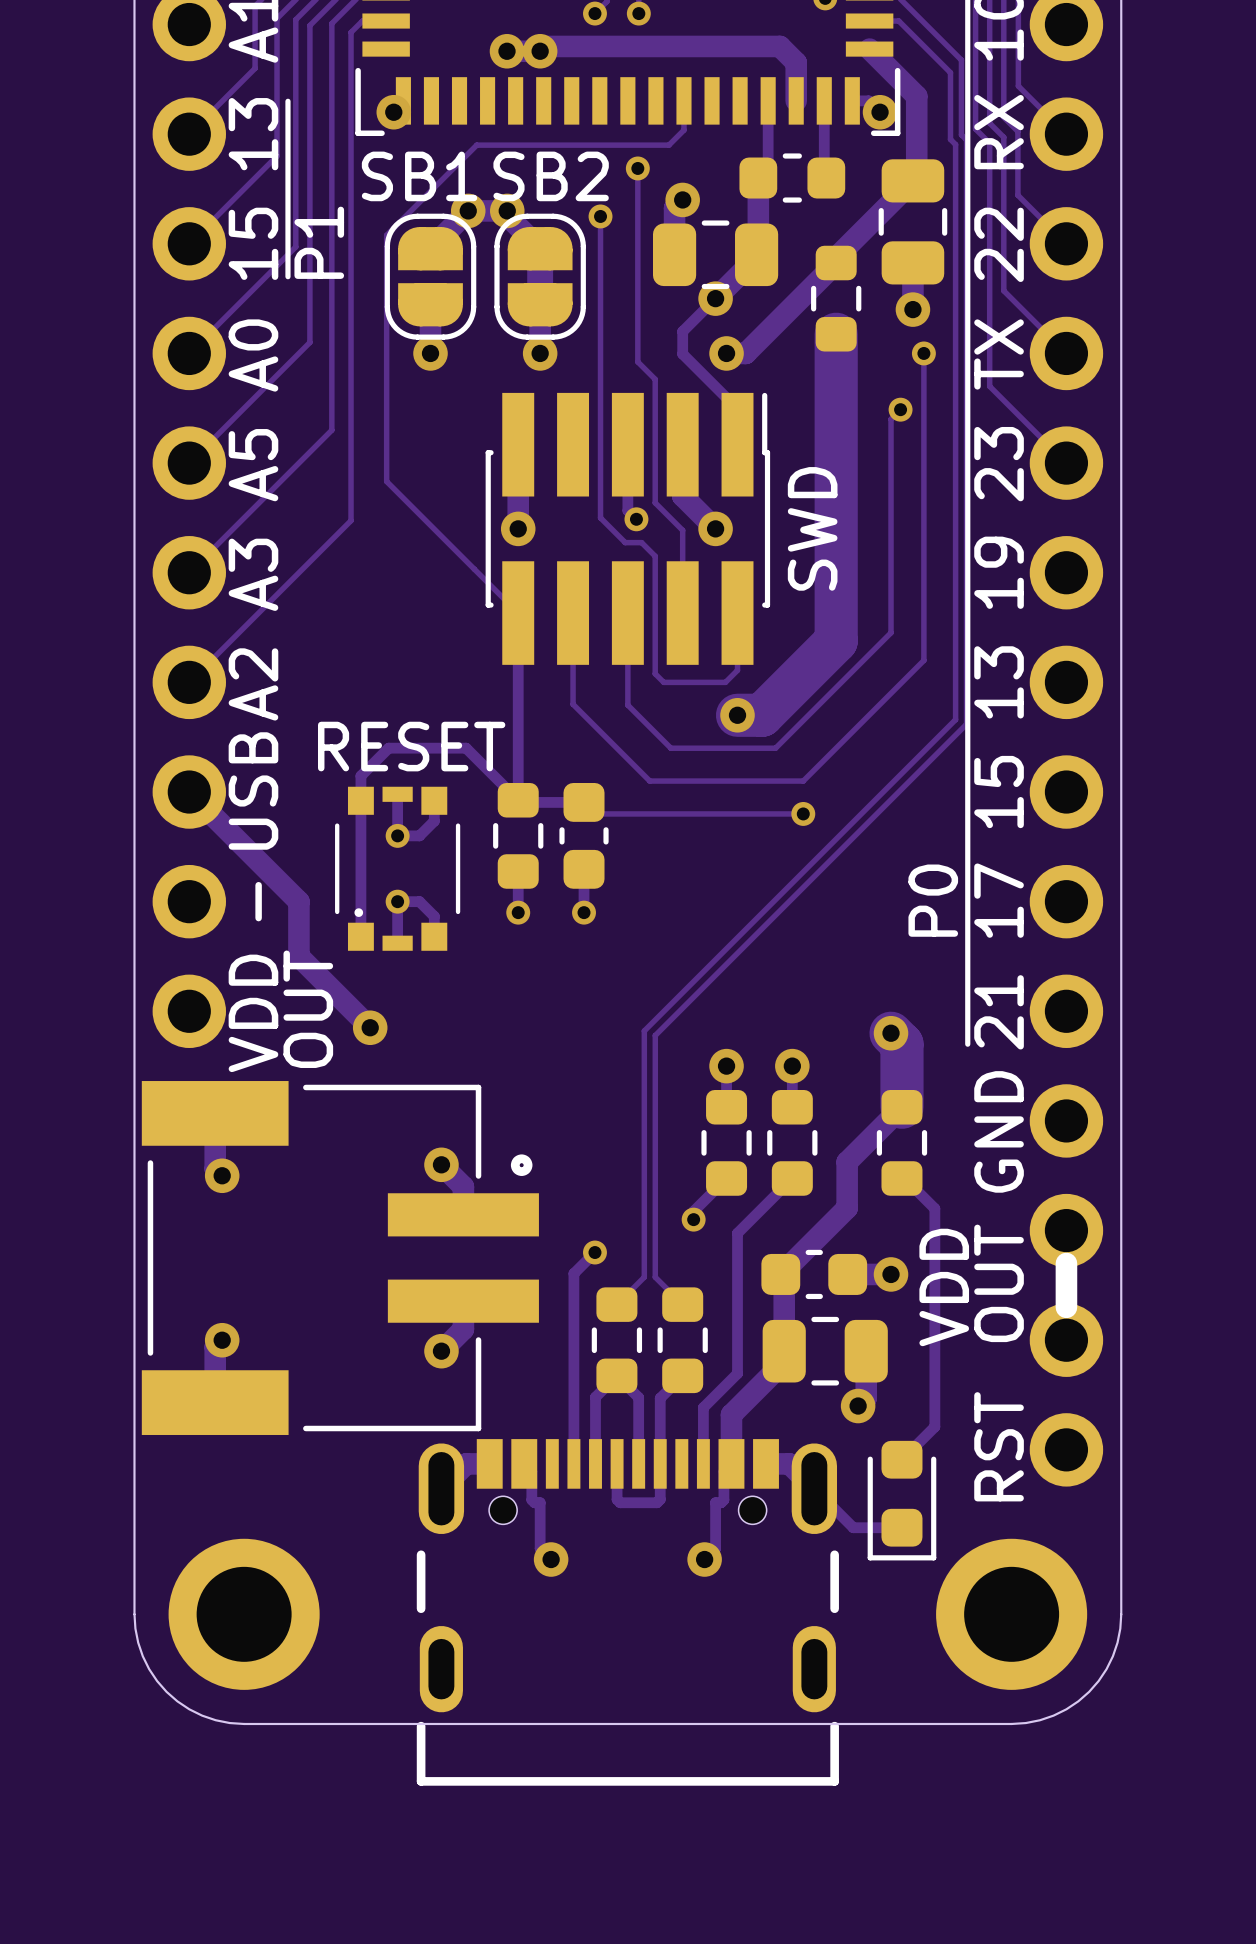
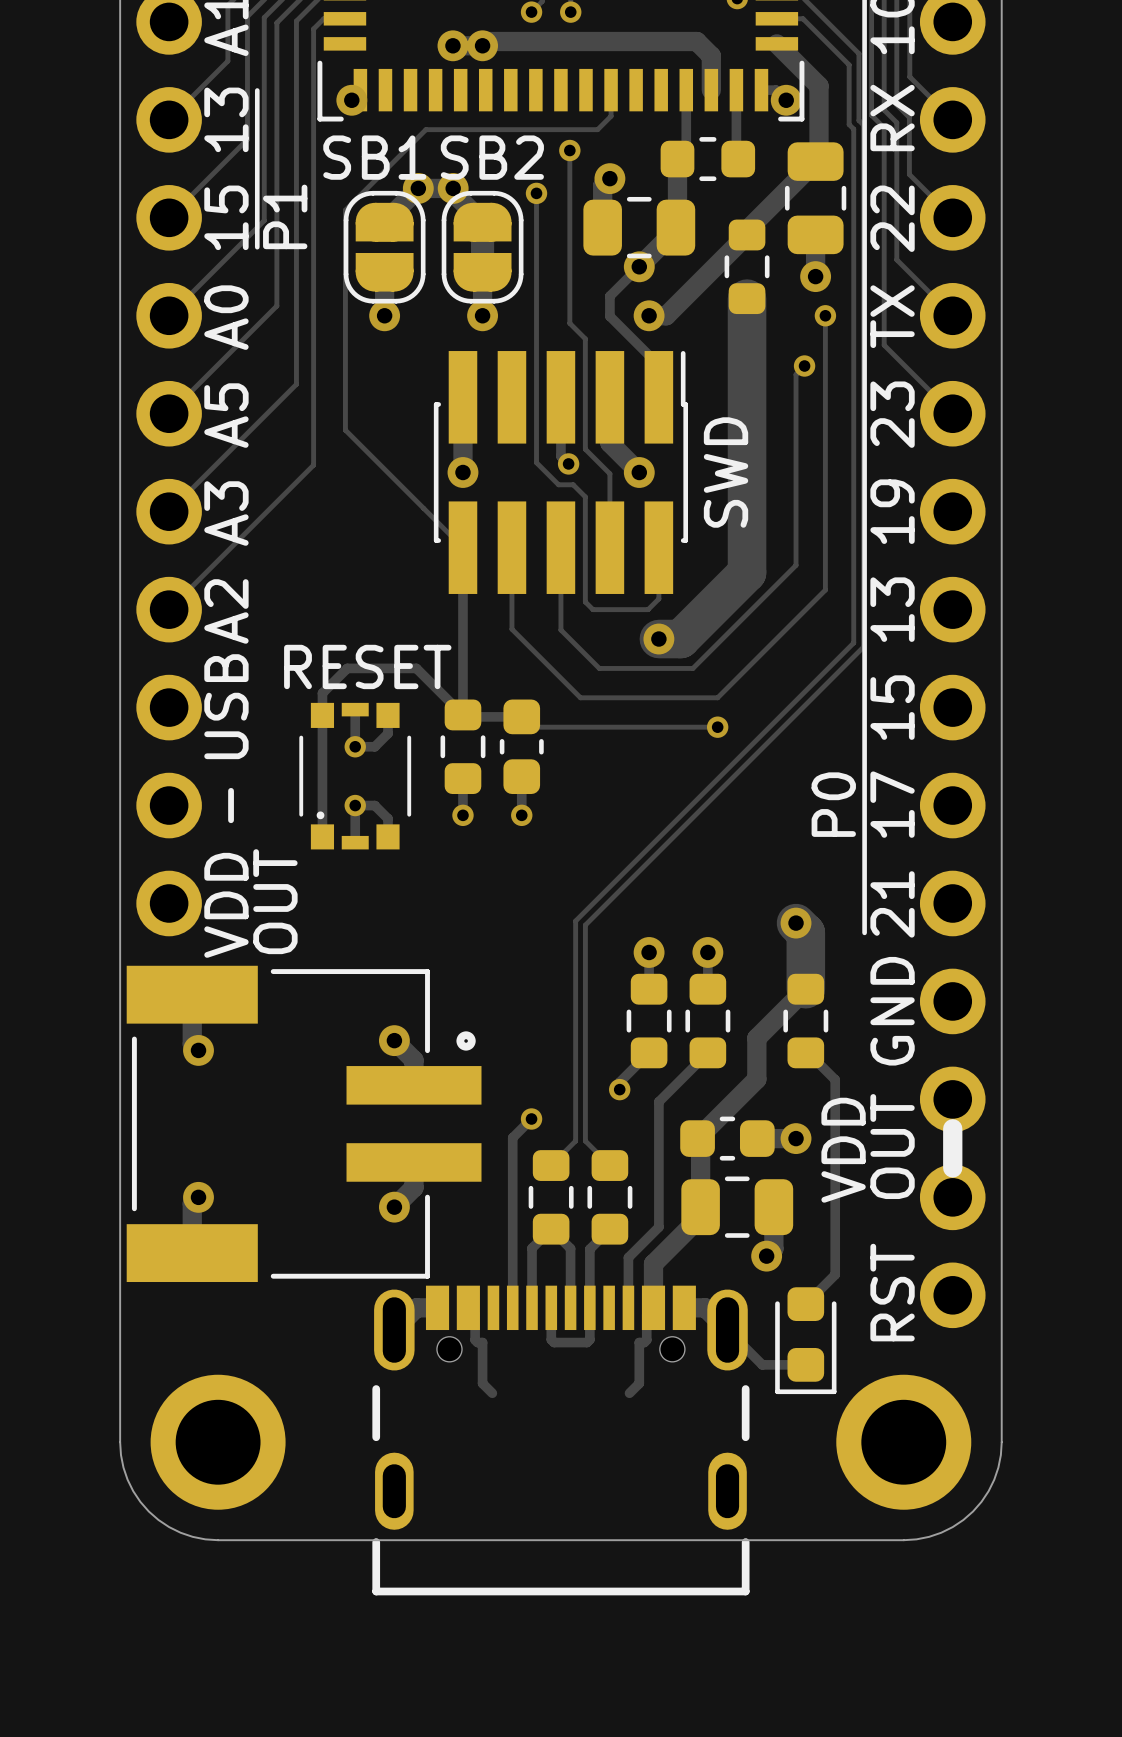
track: (189, 792) (298, 901) (298, 956) (370, 1027) -> none
via: (370, 1027) -> none
via: (551, 1559) -> none
via: (704, 1559) -> none

